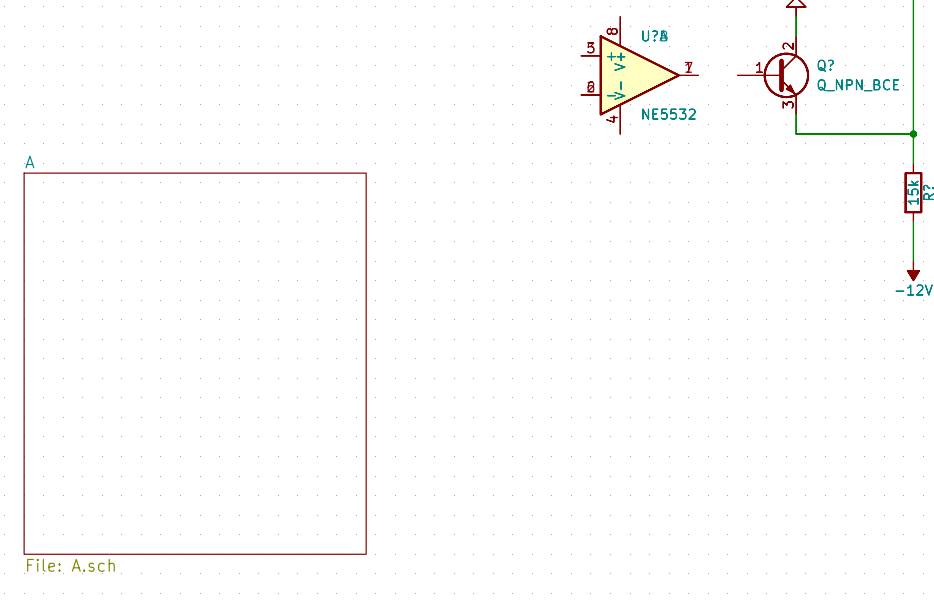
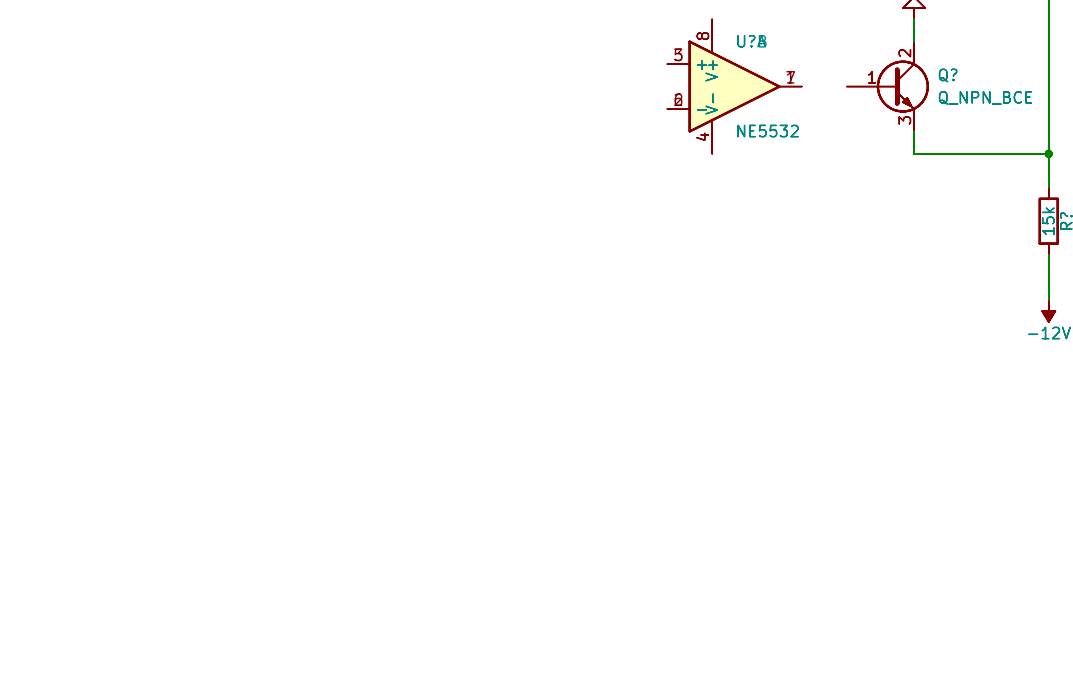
sheet A: File: A.sch (195, 363) -> none

